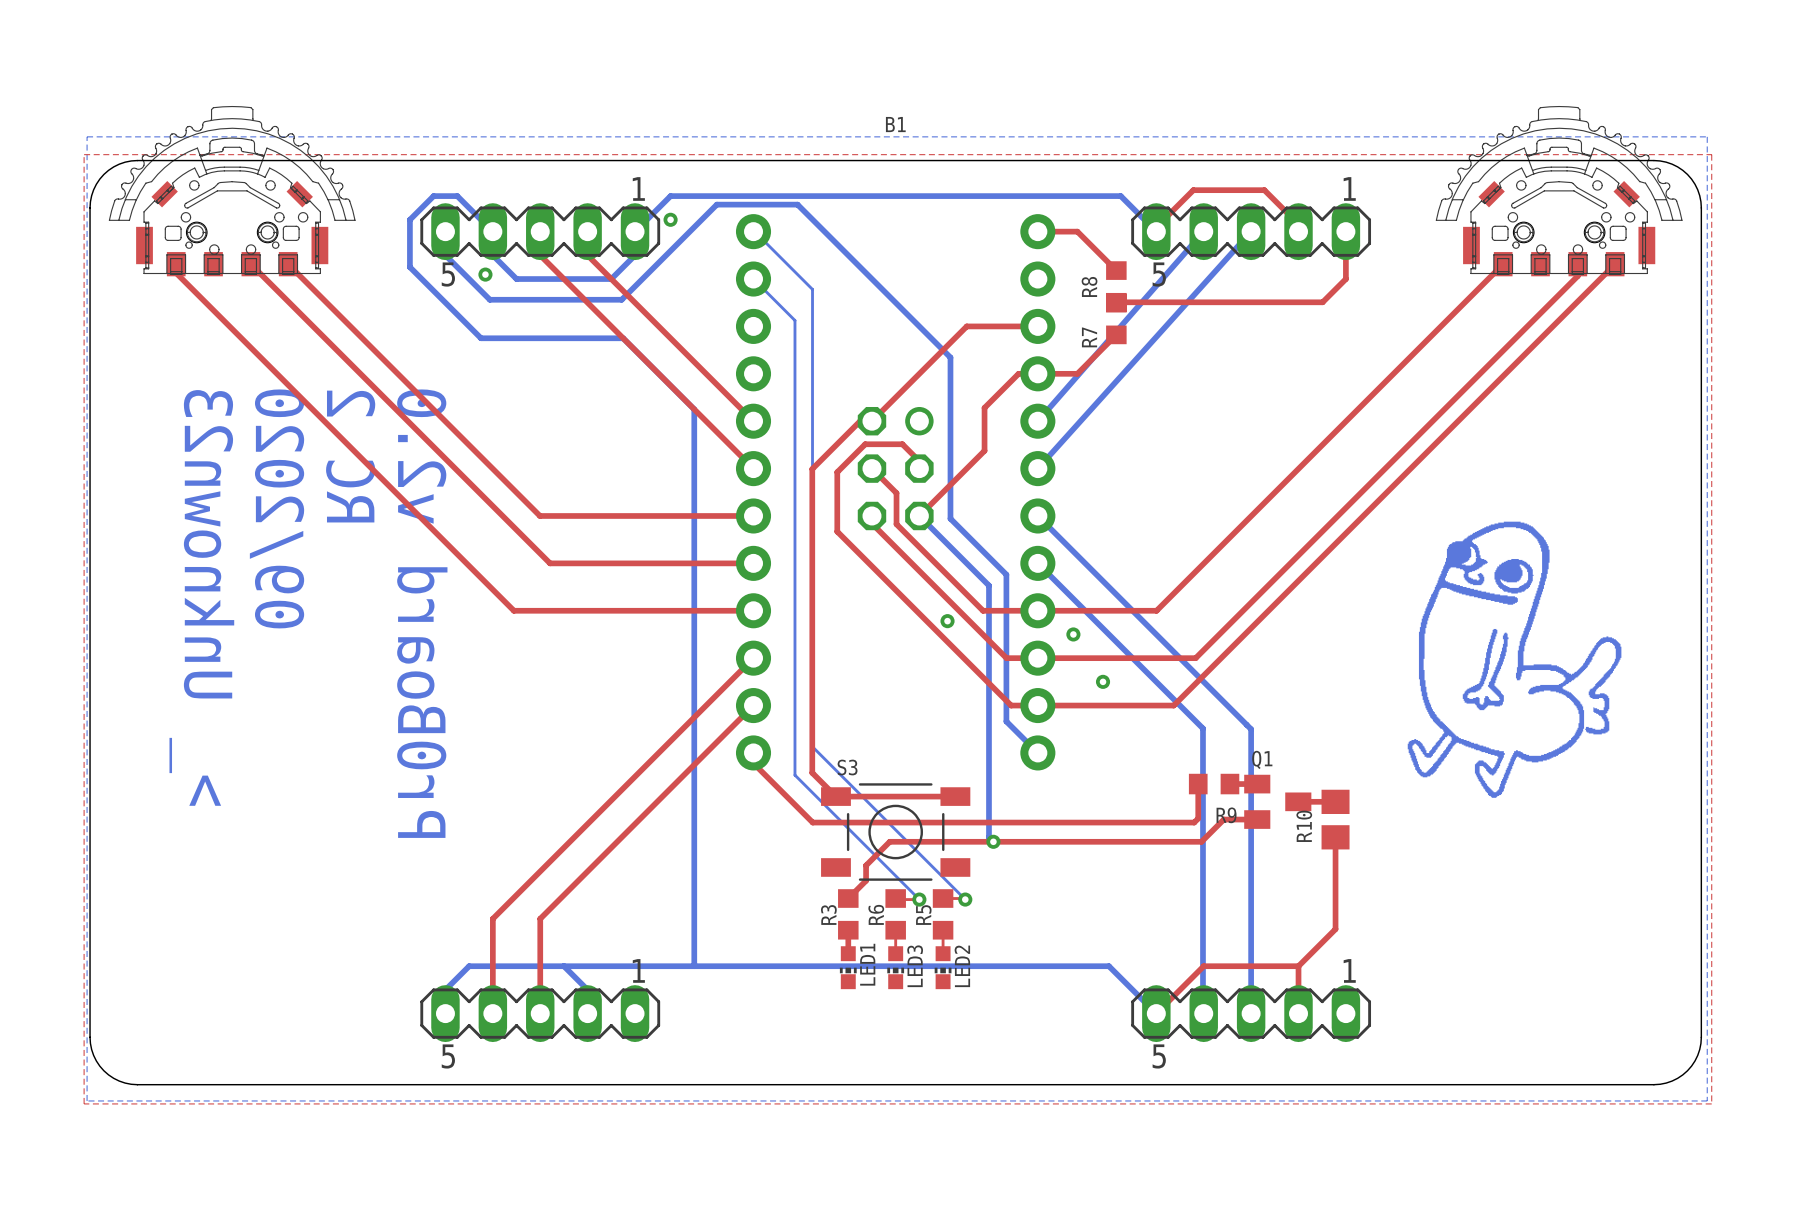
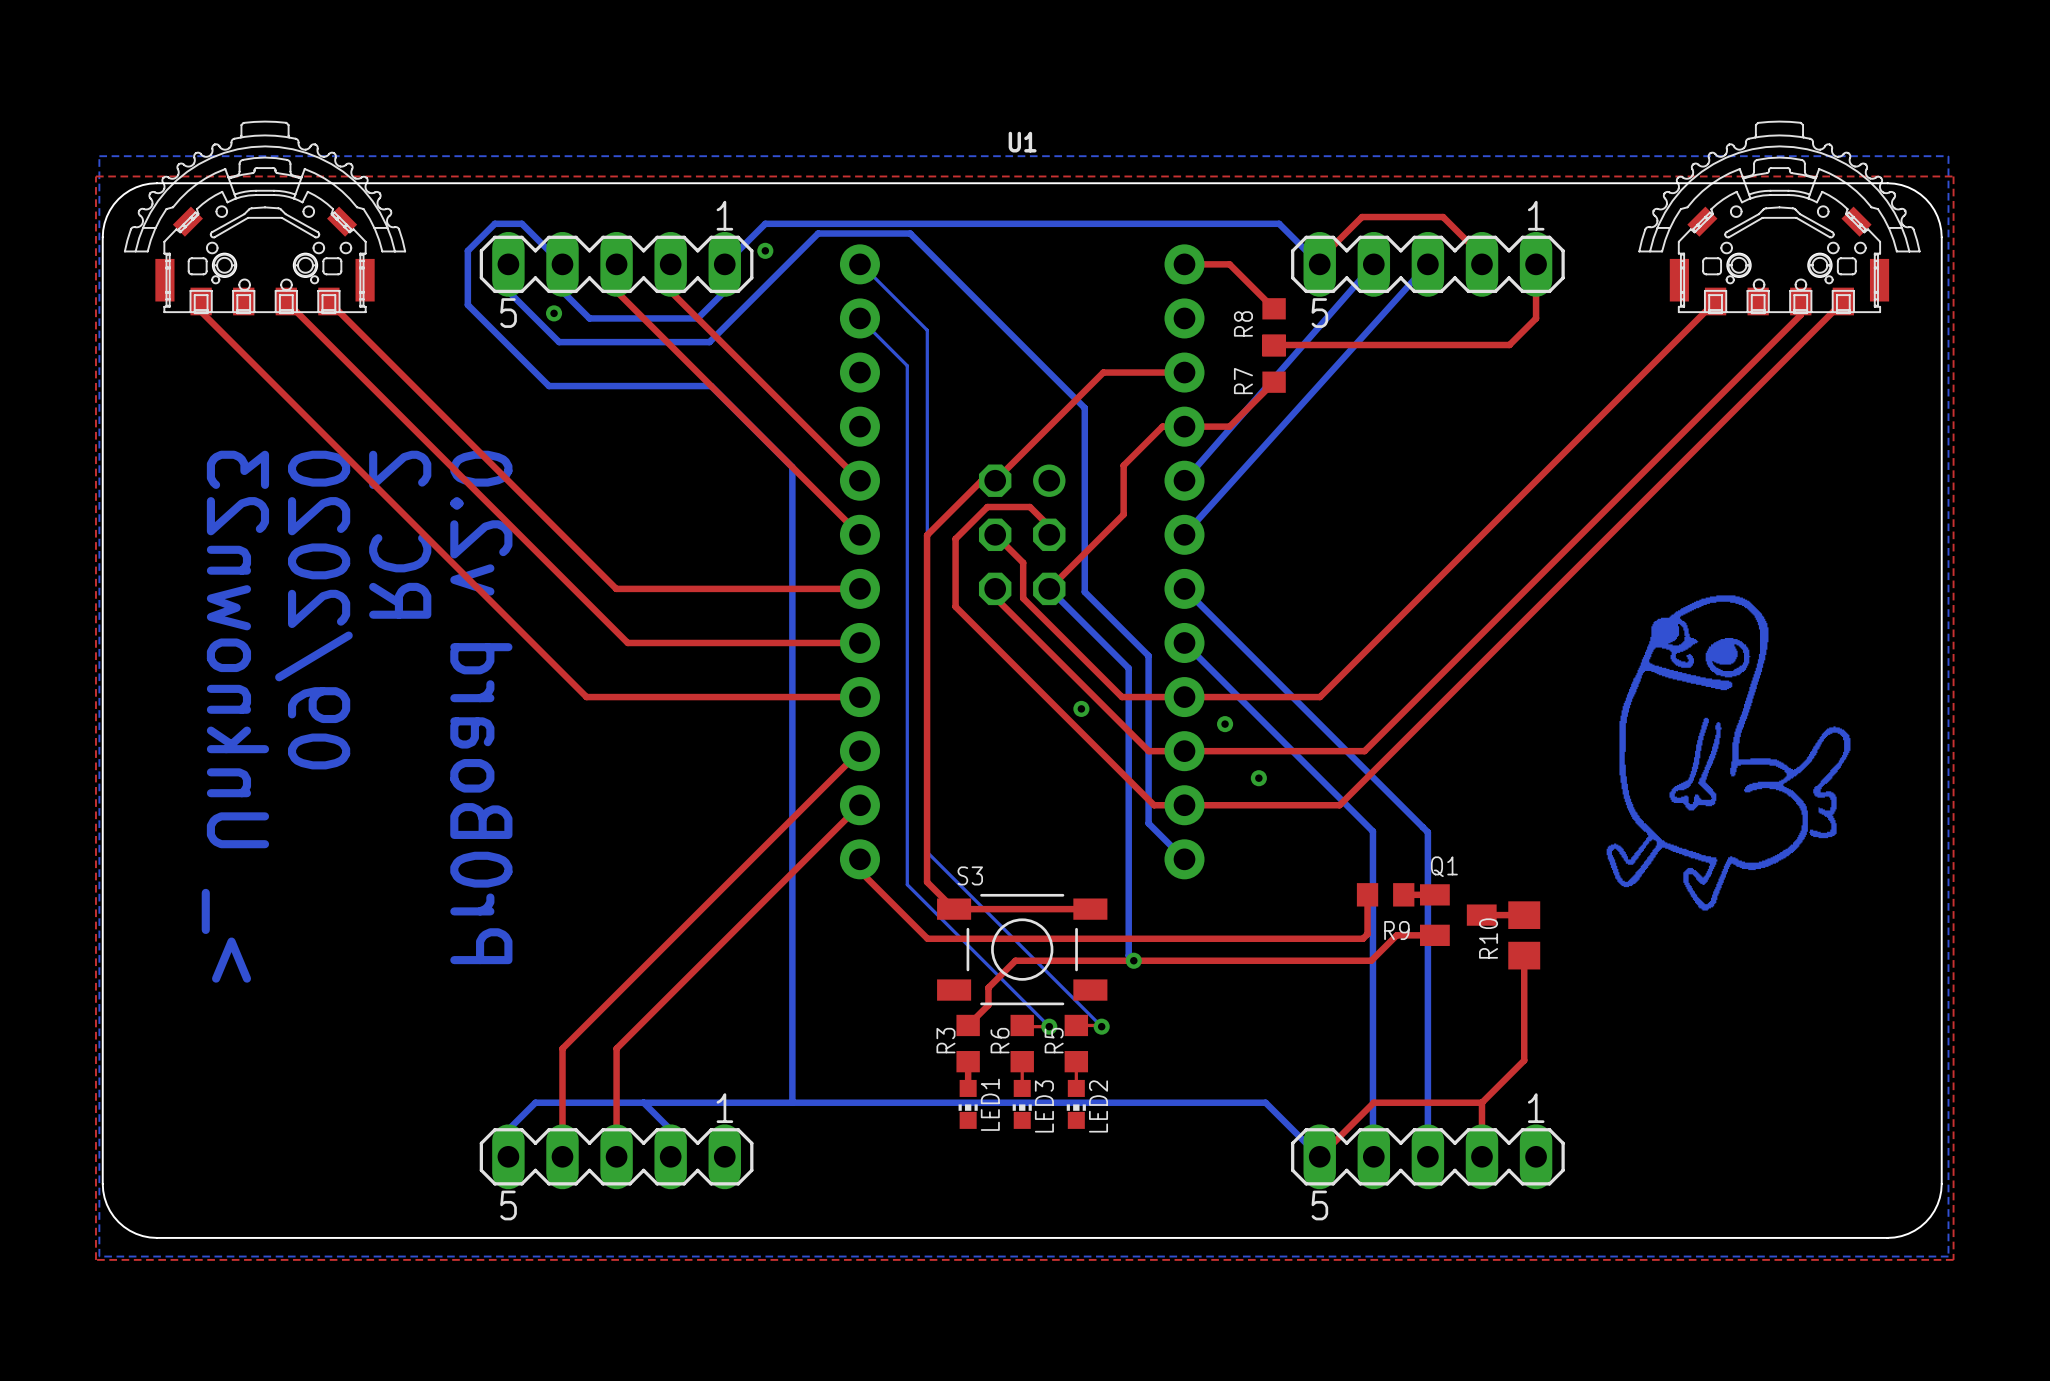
B1 name: B1 (895, 124) -> U1 (1022, 142)

